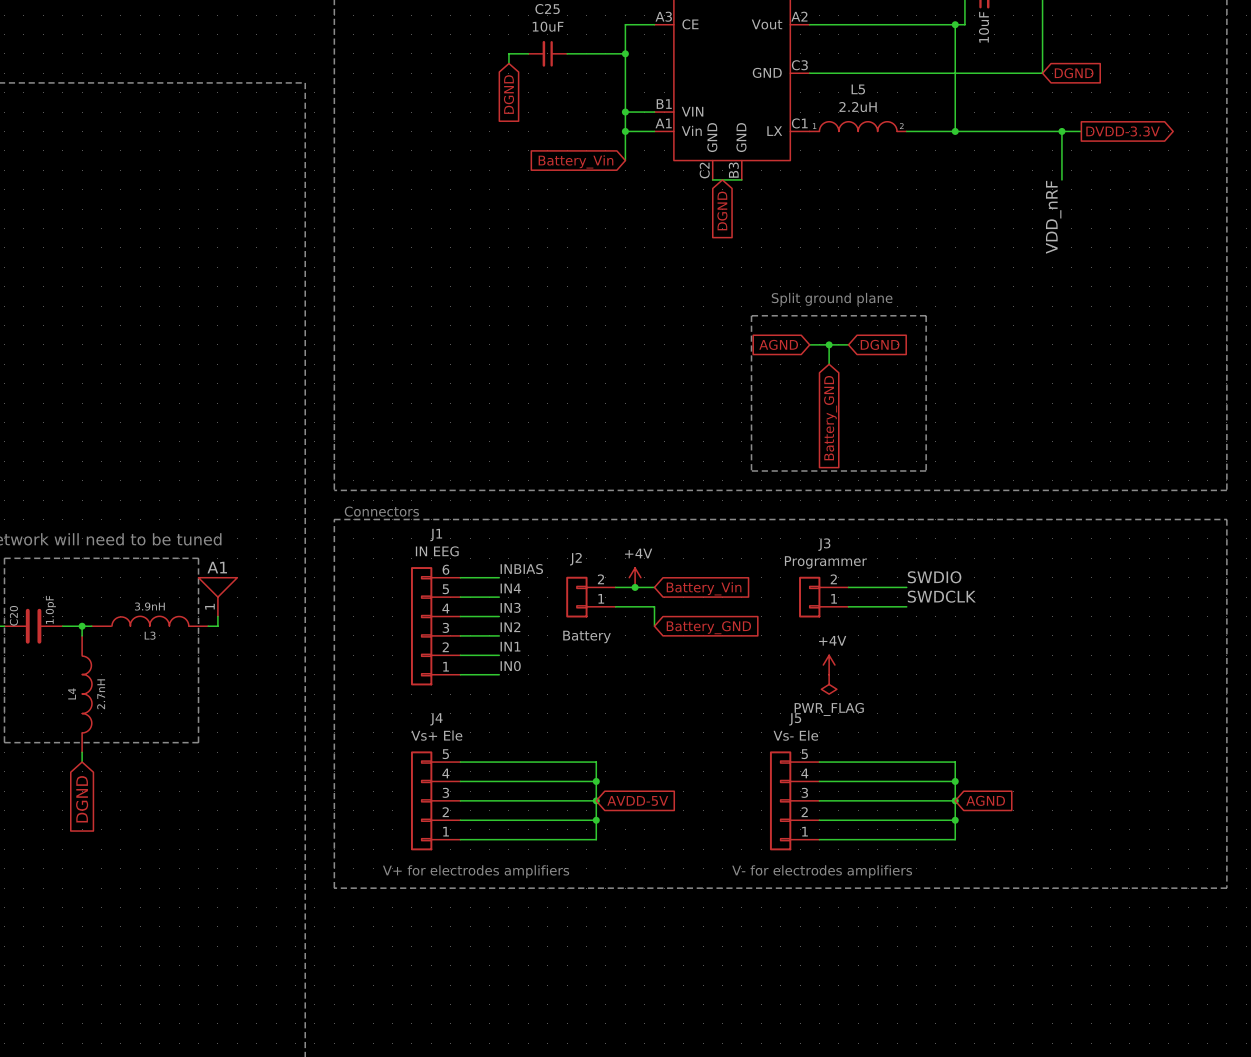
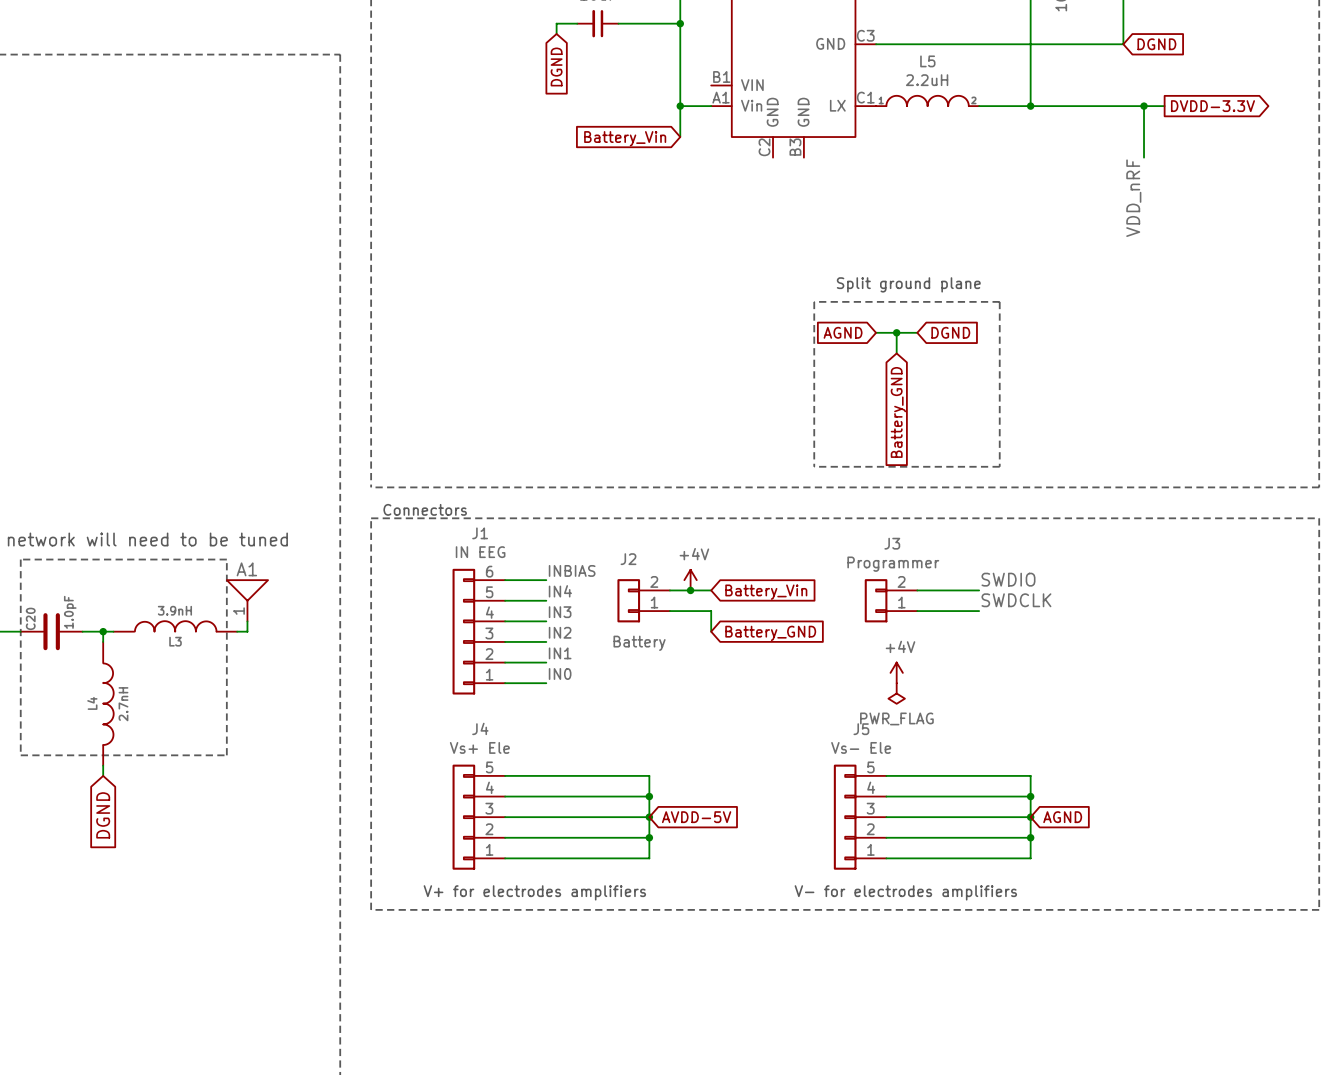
wire: (625, 112) (654, 112) -> none
junction: (625, 112) -> none
wire: (712, 179) (741, 179) -> none
global label: DGND (722, 210) -> none

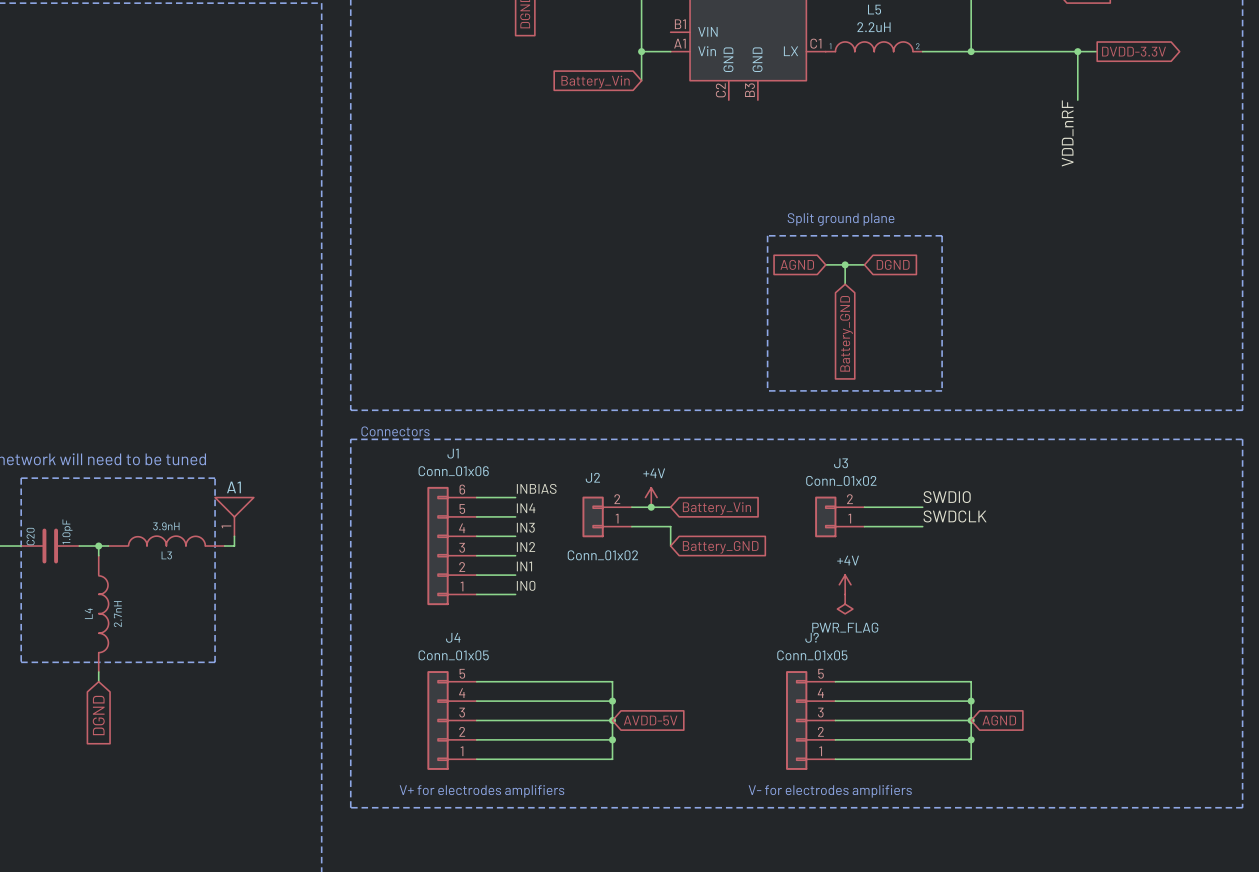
J1 value: IN EEG (480, 552) -> Conn_01x06 (453, 471)
J3 value: Programmer (893, 564) -> Conn_01x02 (841, 480)
J2 value: Battery (639, 643) -> Conn_01x02 (602, 555)
J5 name: J5 (861, 729) -> J? (812, 637)
J4 value: Vs+ Ele (479, 747) -> Conn_01x05 (453, 655)
J5 value: Vs- Ele (861, 747) -> Conn_01x05 (812, 655)

